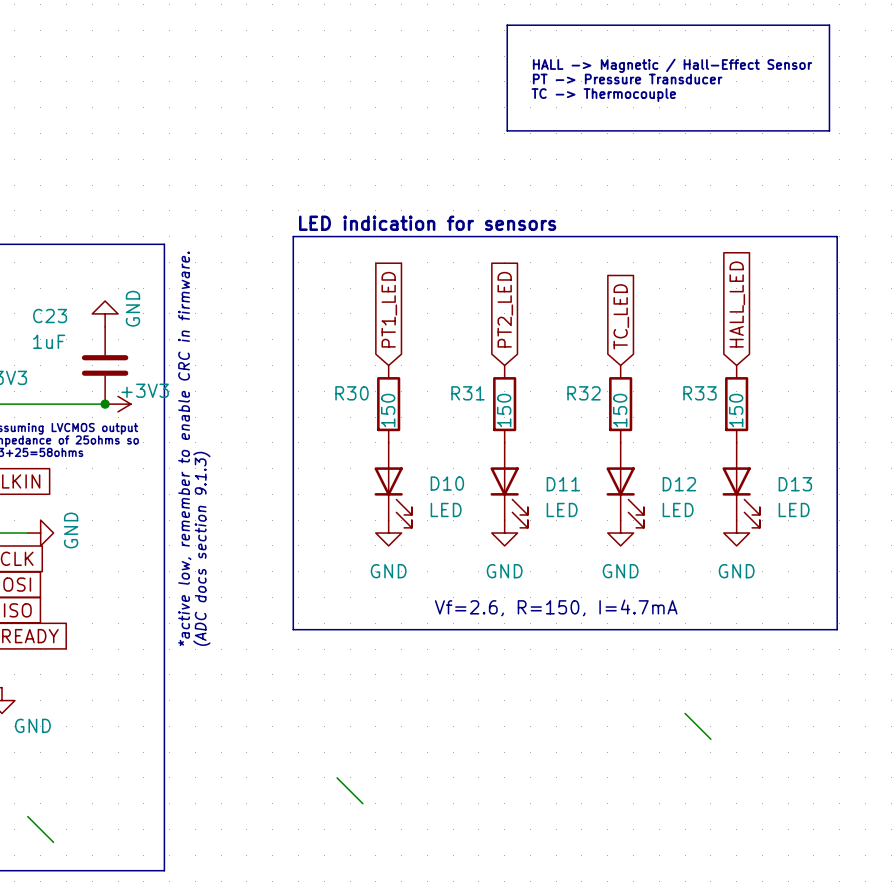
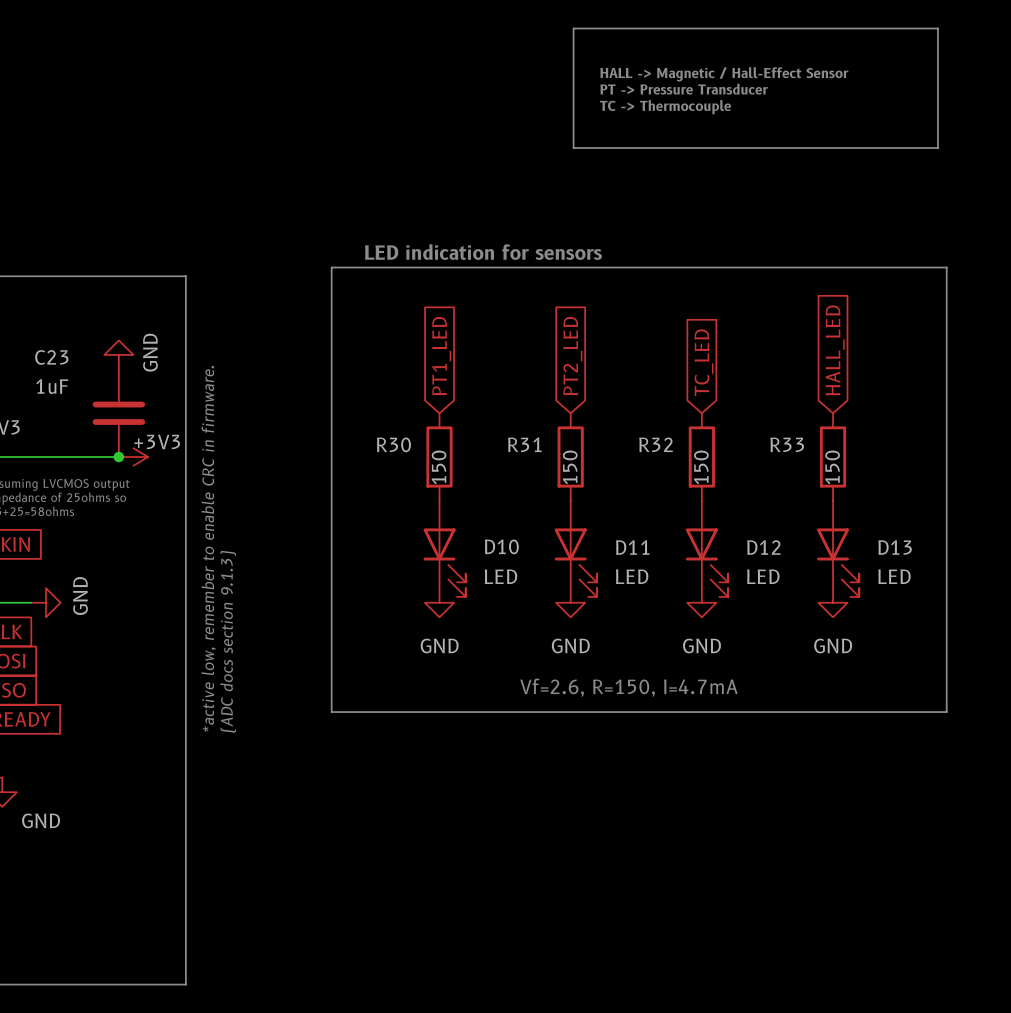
wire: (685, 713) (710, 739) -> none
wire: (337, 777) (362, 803) -> none
wire: (27, 816) (53, 842) -> none

